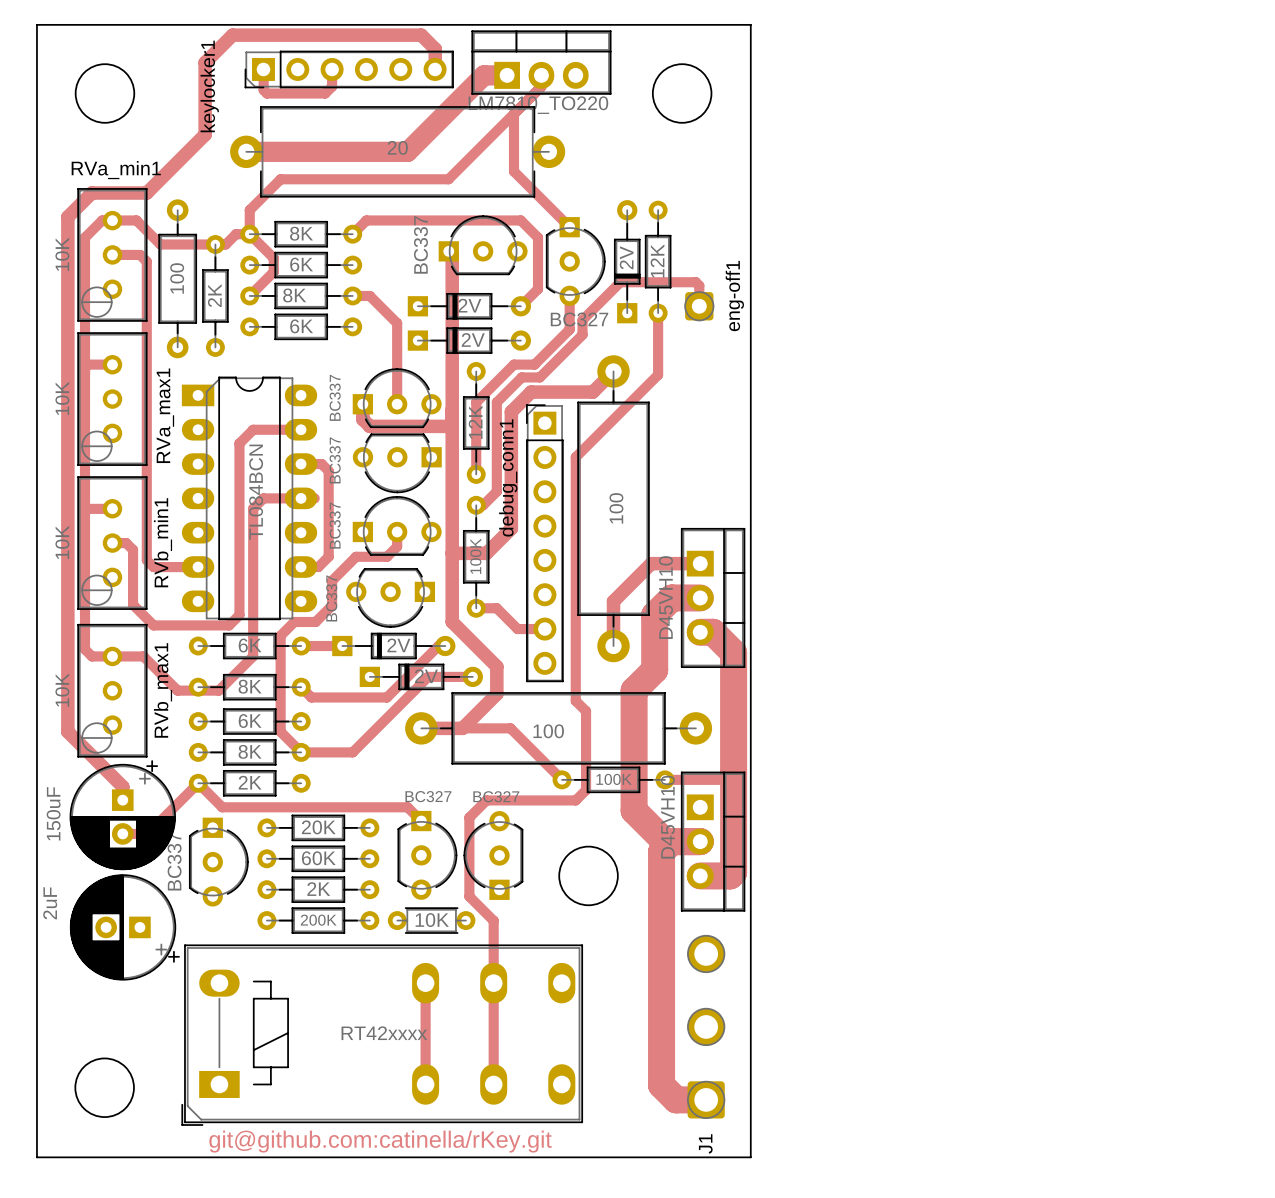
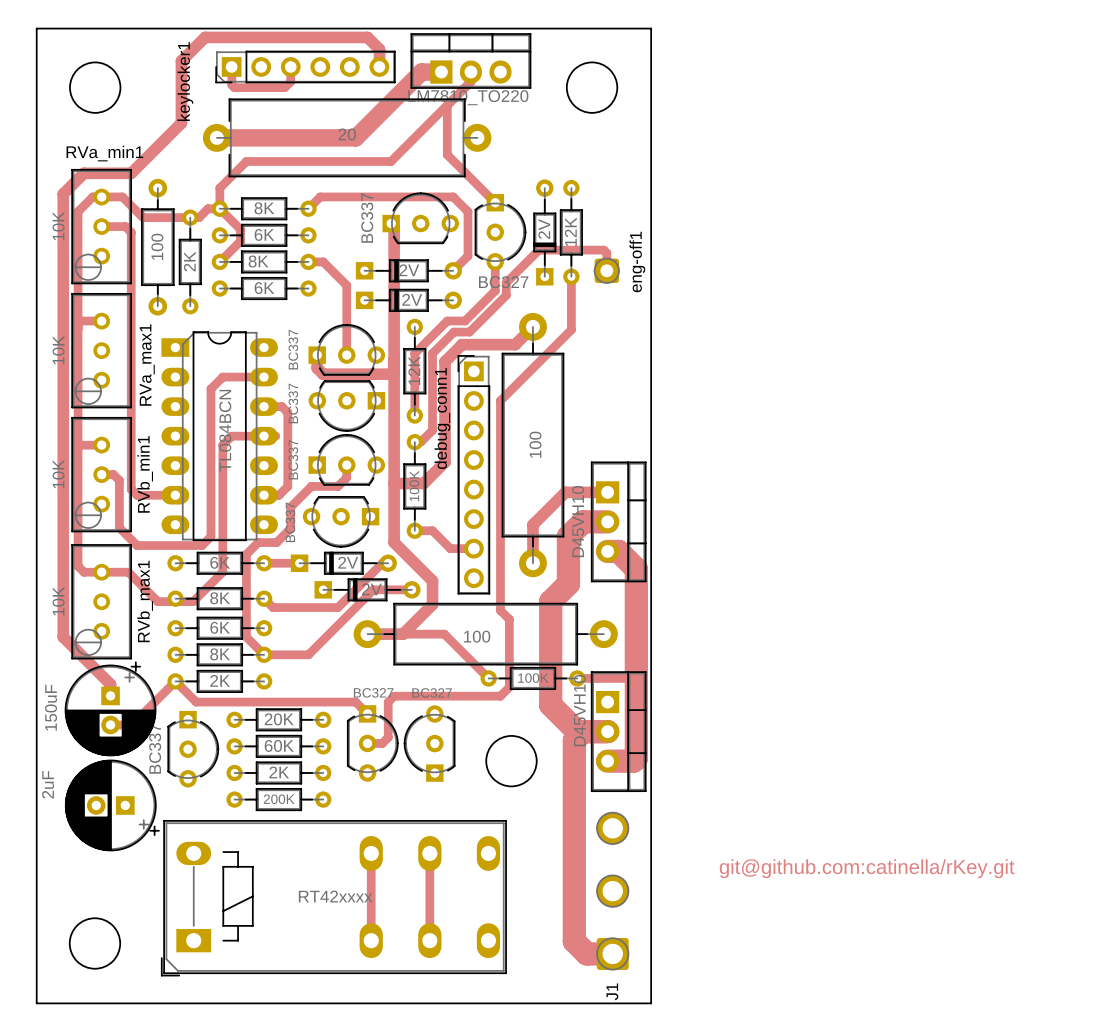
track: (486, 800) (469, 817) (469, 896) (493, 920) (493, 986) -> (423, 696) (394, 696) (388, 702) (388, 737) (382, 743) (367, 743)
part: 10K (431, 920) -> none
text: none -> git@github.com:catinella/rKey.git (867, 868)
text: git@github.com:catinella/rKey.git (380, 1141) -> none

